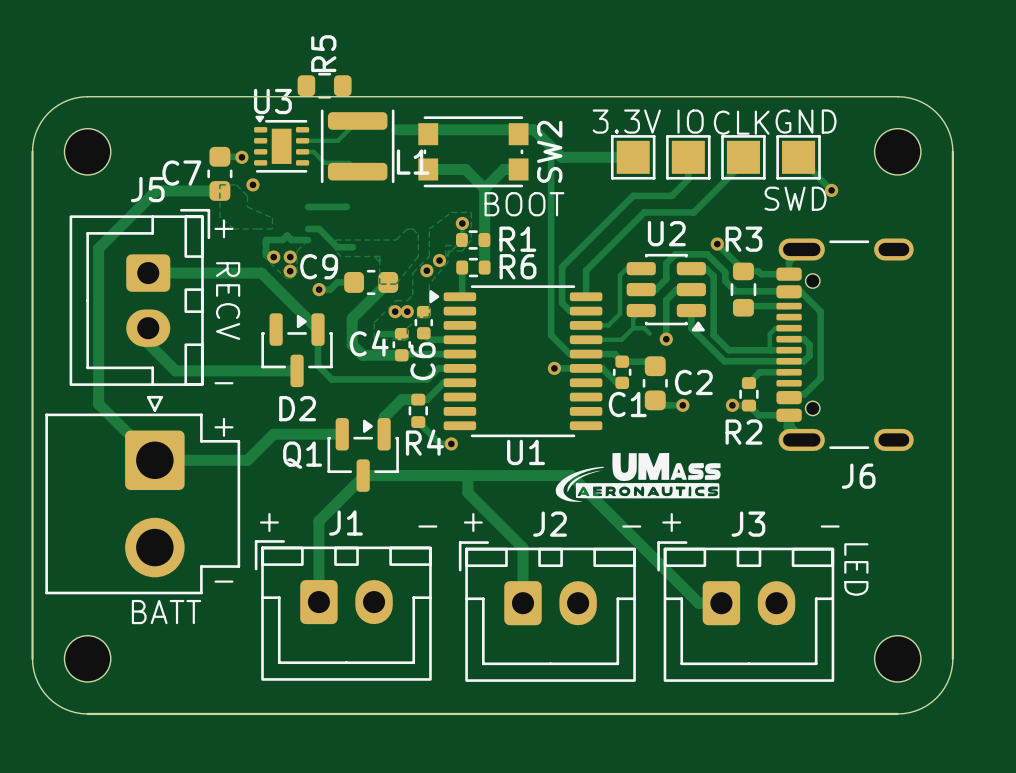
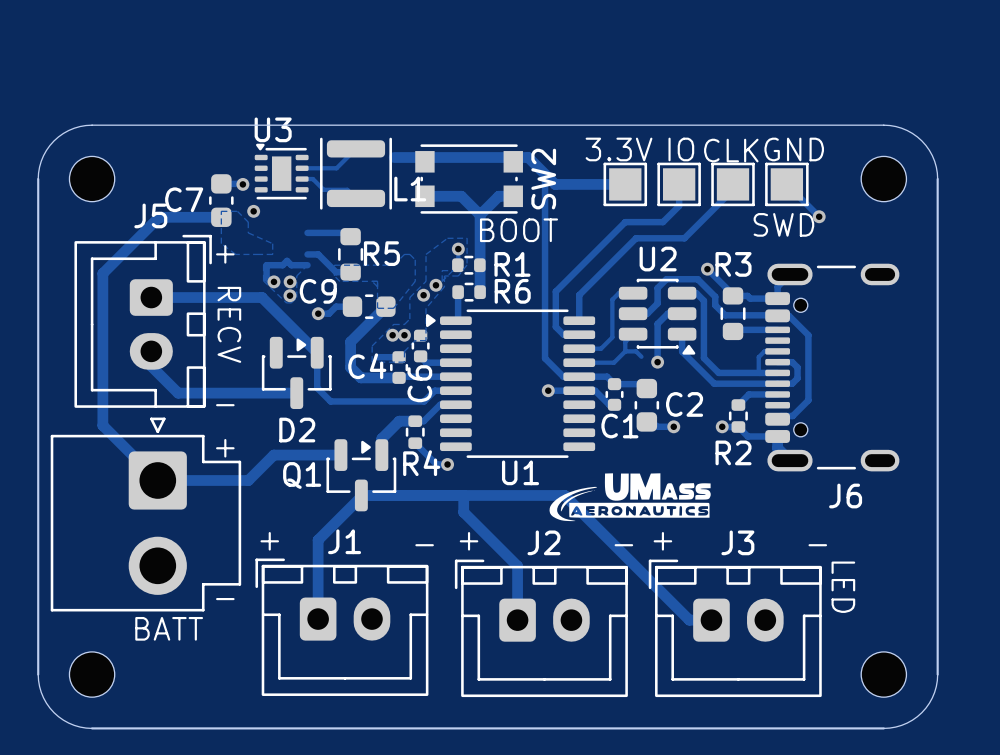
R5 rotation: 0° (324, 85) -> 90° clockwise (350, 254)
R5 position: (324, 85) -> (350, 254)

